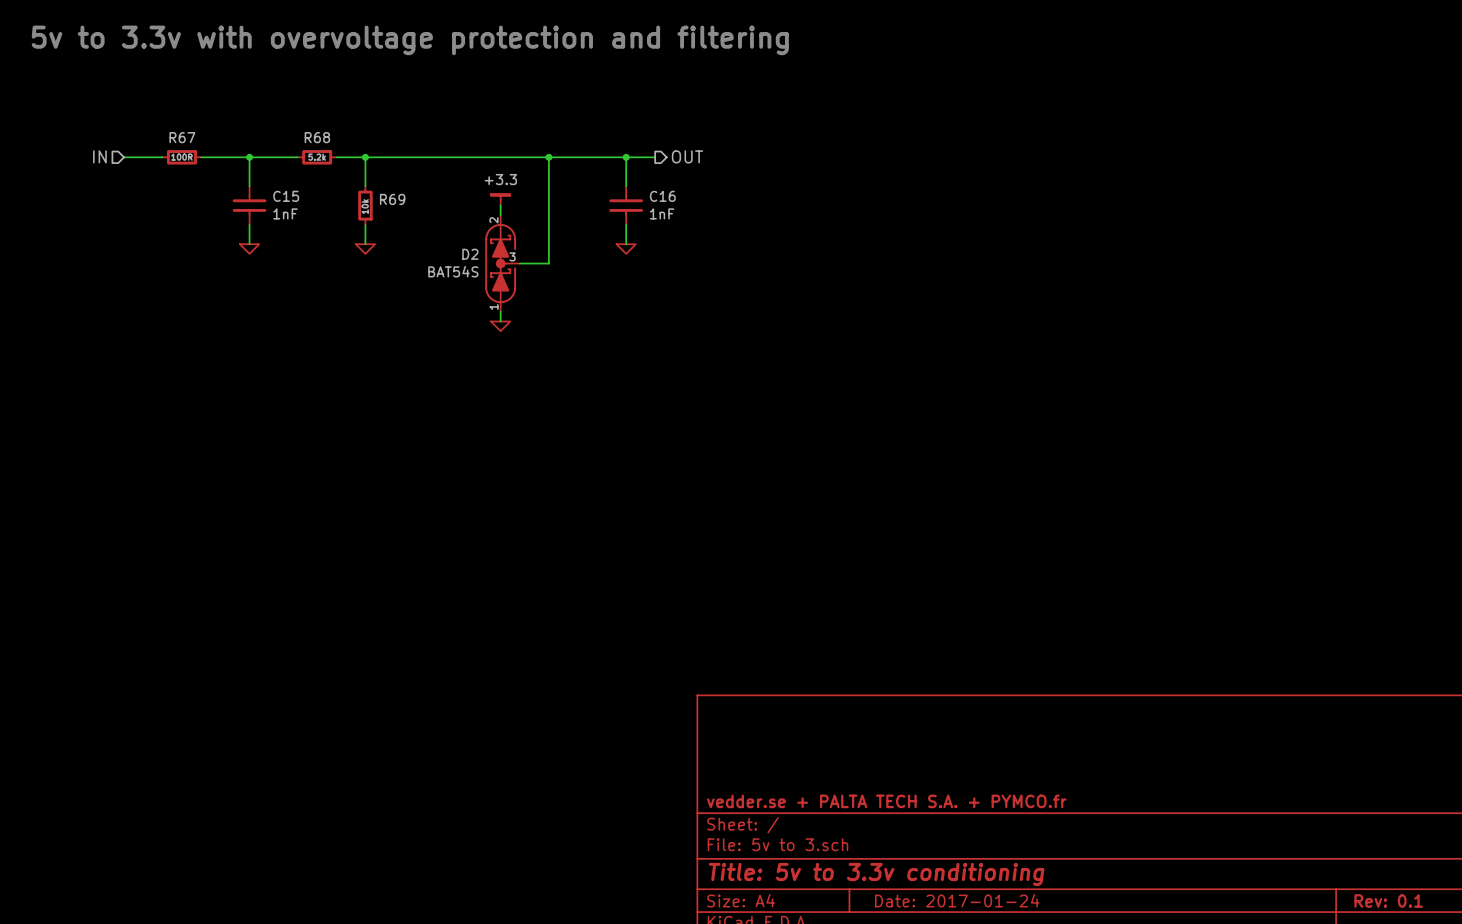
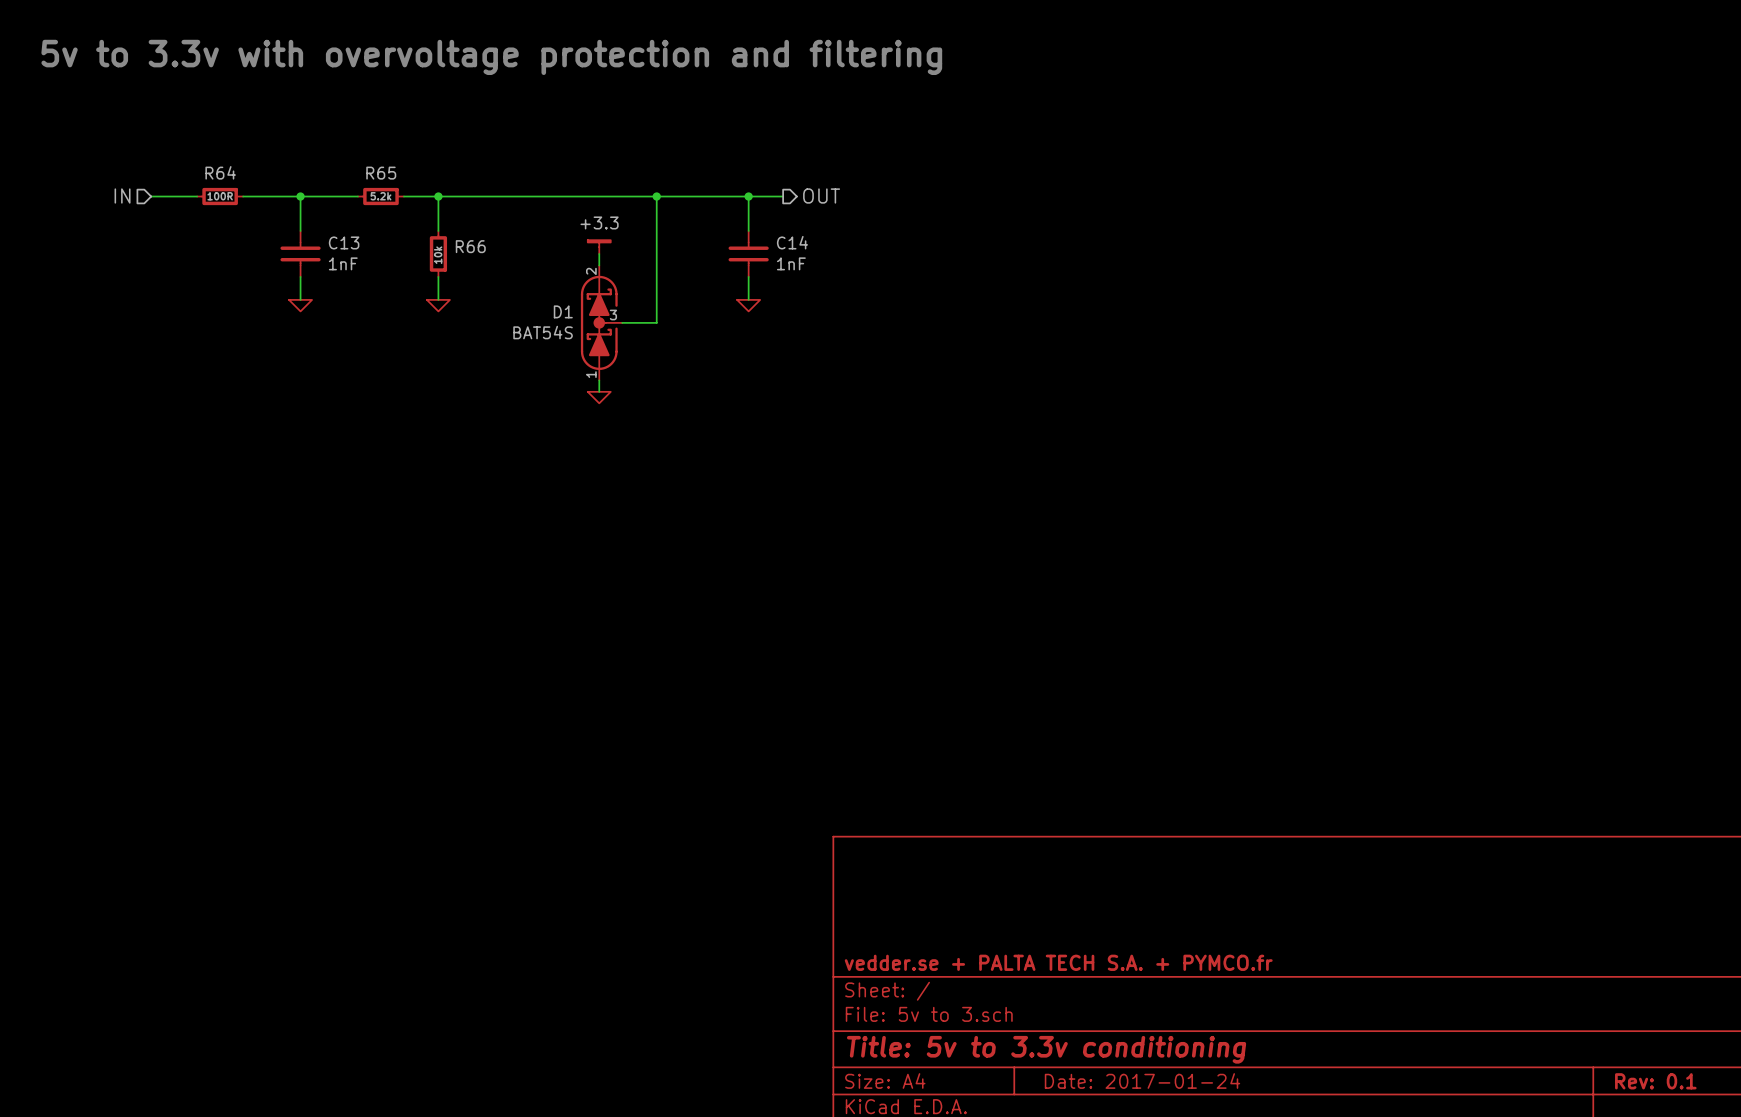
R67 name: R67 (182, 137) -> R64 (220, 172)
R68 name: R68 (317, 137) -> R65 (381, 173)
C15 name: C15 (286, 196) -> C13 (344, 242)
C16 name: C16 (662, 196) -> C14 (792, 242)
R69 name: R69 (392, 199) -> R66 (470, 246)
D2 name: D2 (470, 254) -> D1 (563, 311)

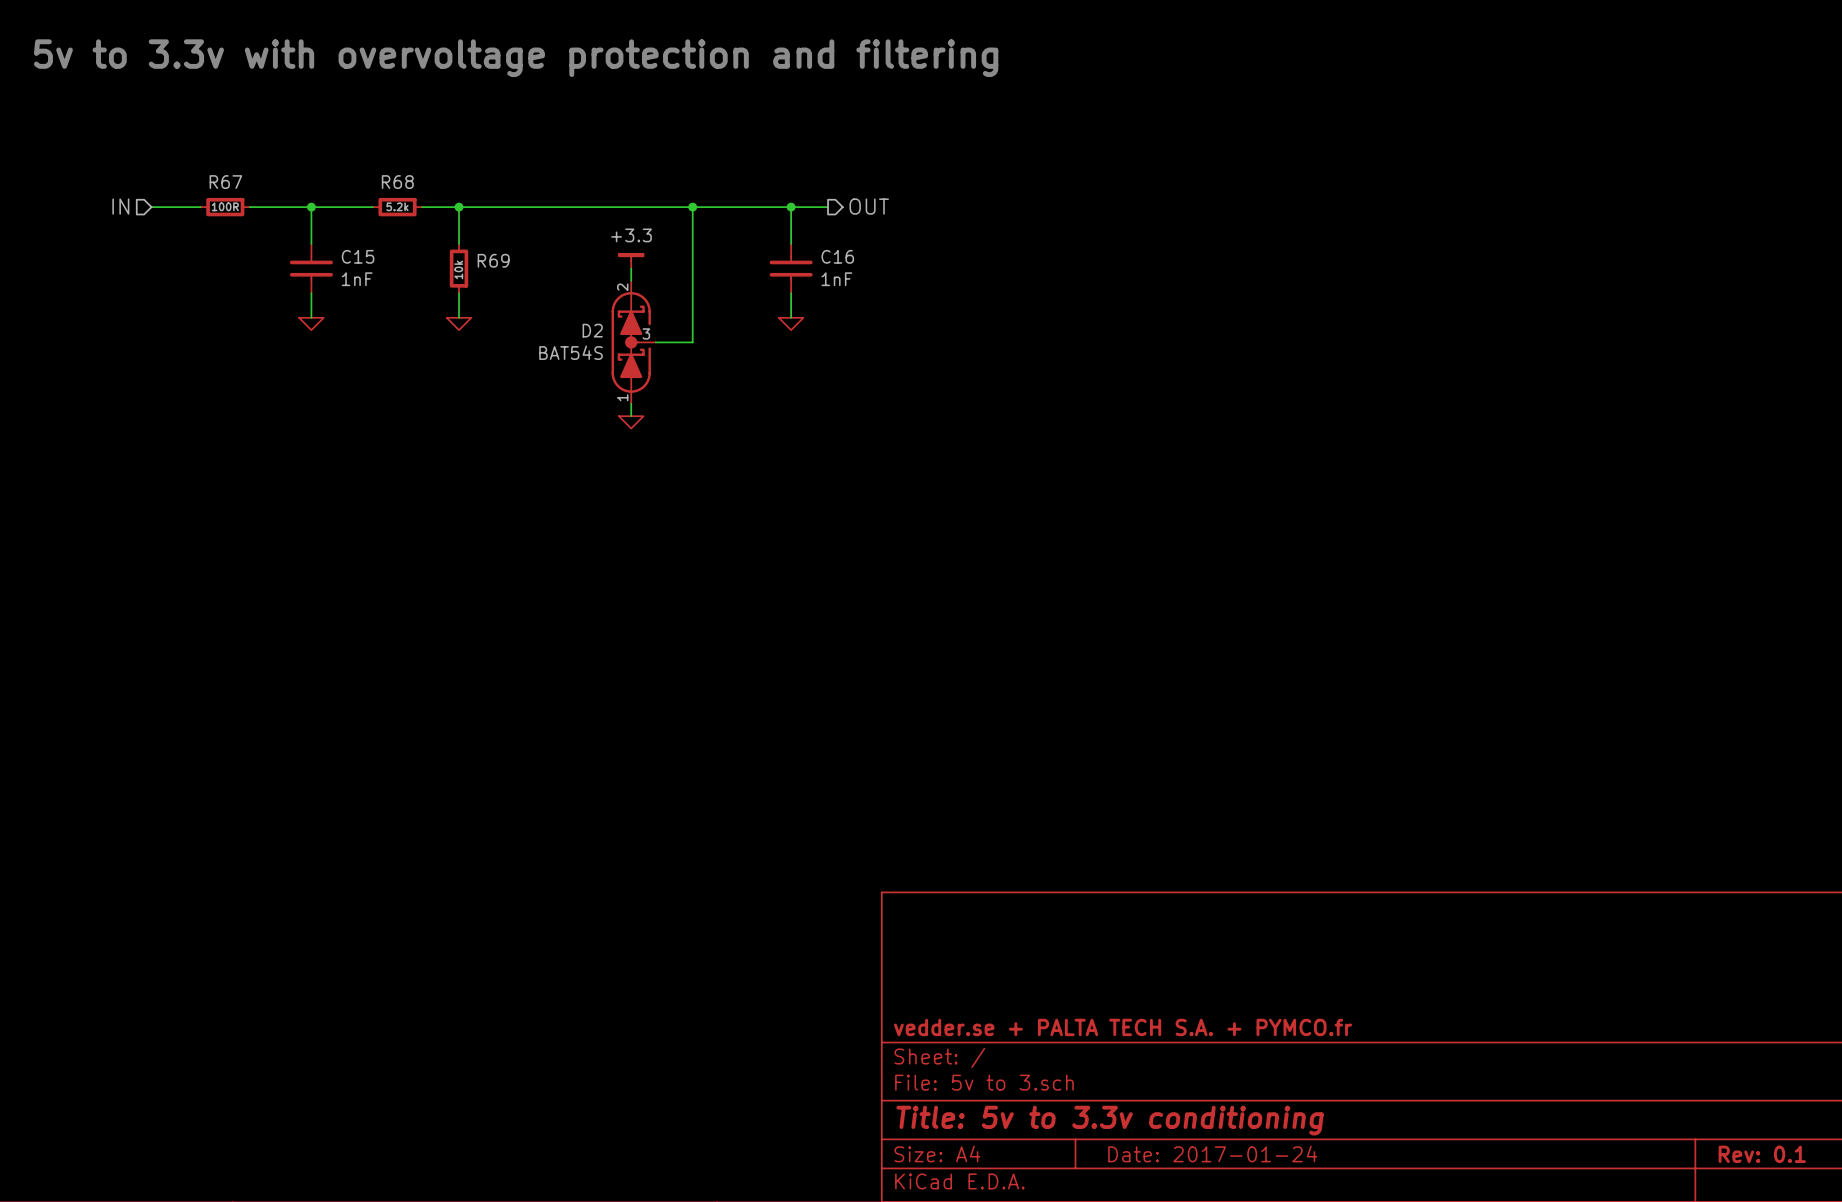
R64 name: R64 (220, 172) -> R67 (225, 182)
R65 name: R65 (381, 173) -> R68 (397, 182)
C13 name: C13 (344, 242) -> C15 (358, 256)
C14 name: C14 (792, 242) -> C16 (837, 256)
R66 name: R66 (470, 246) -> R69 (493, 260)
D1 name: D1 (563, 311) -> D2 (592, 330)

